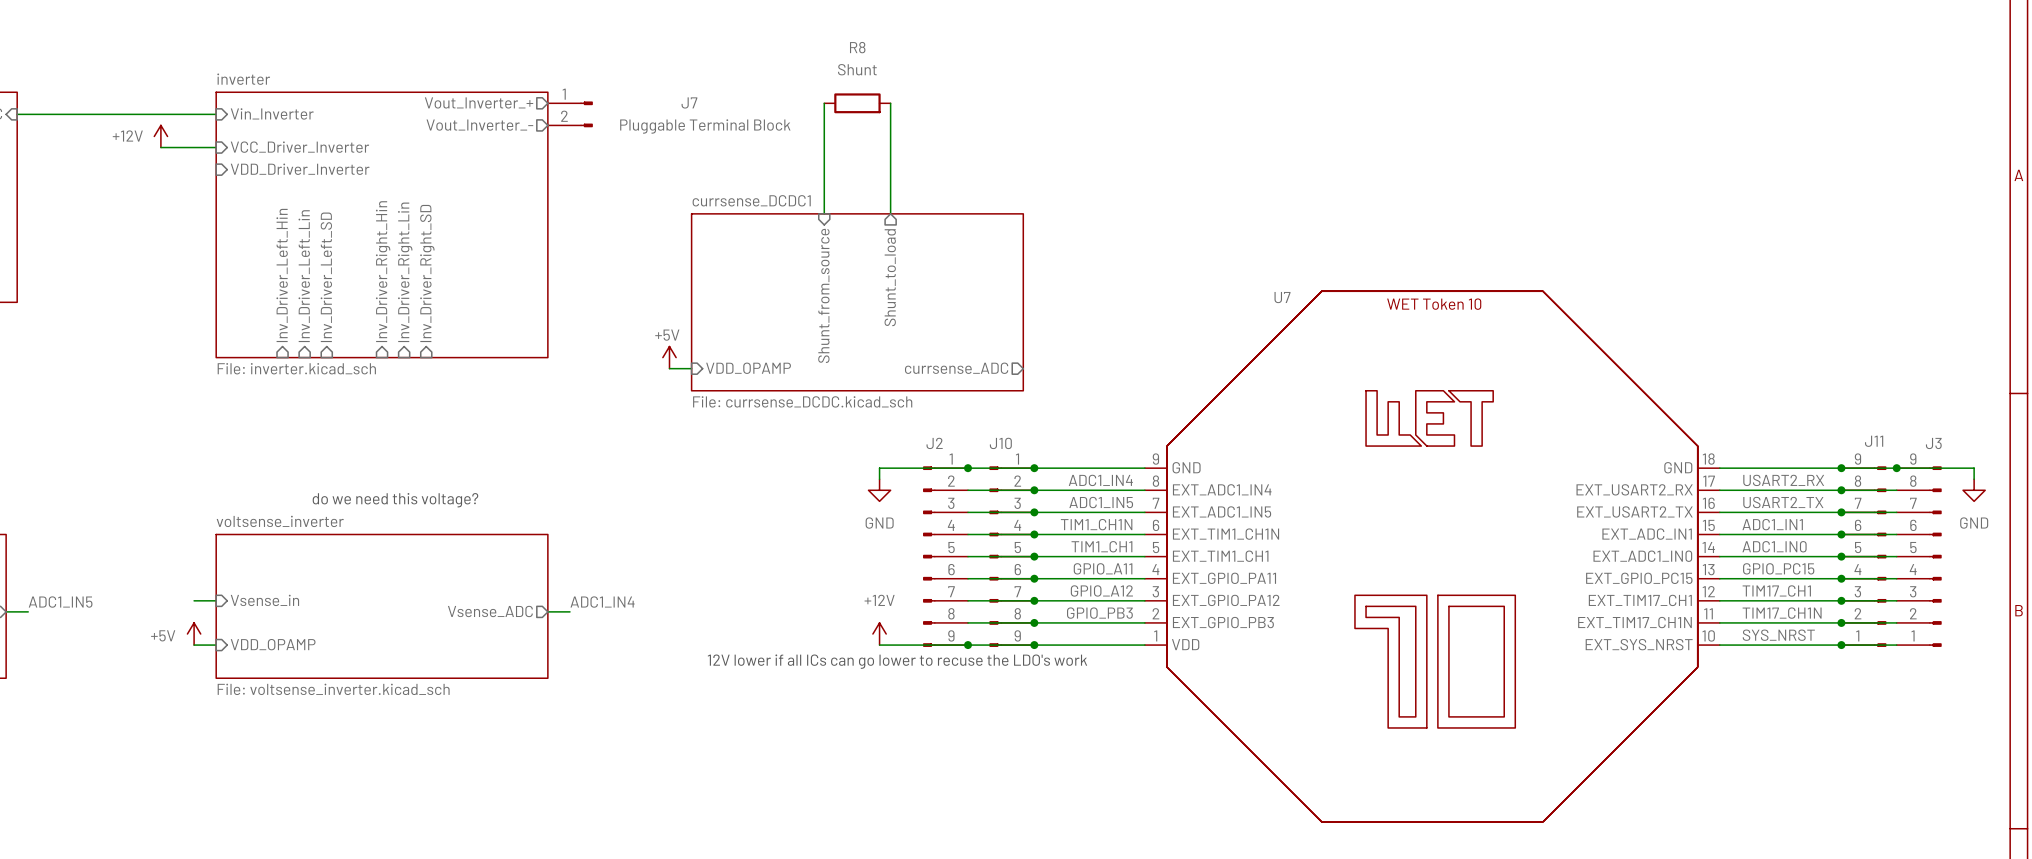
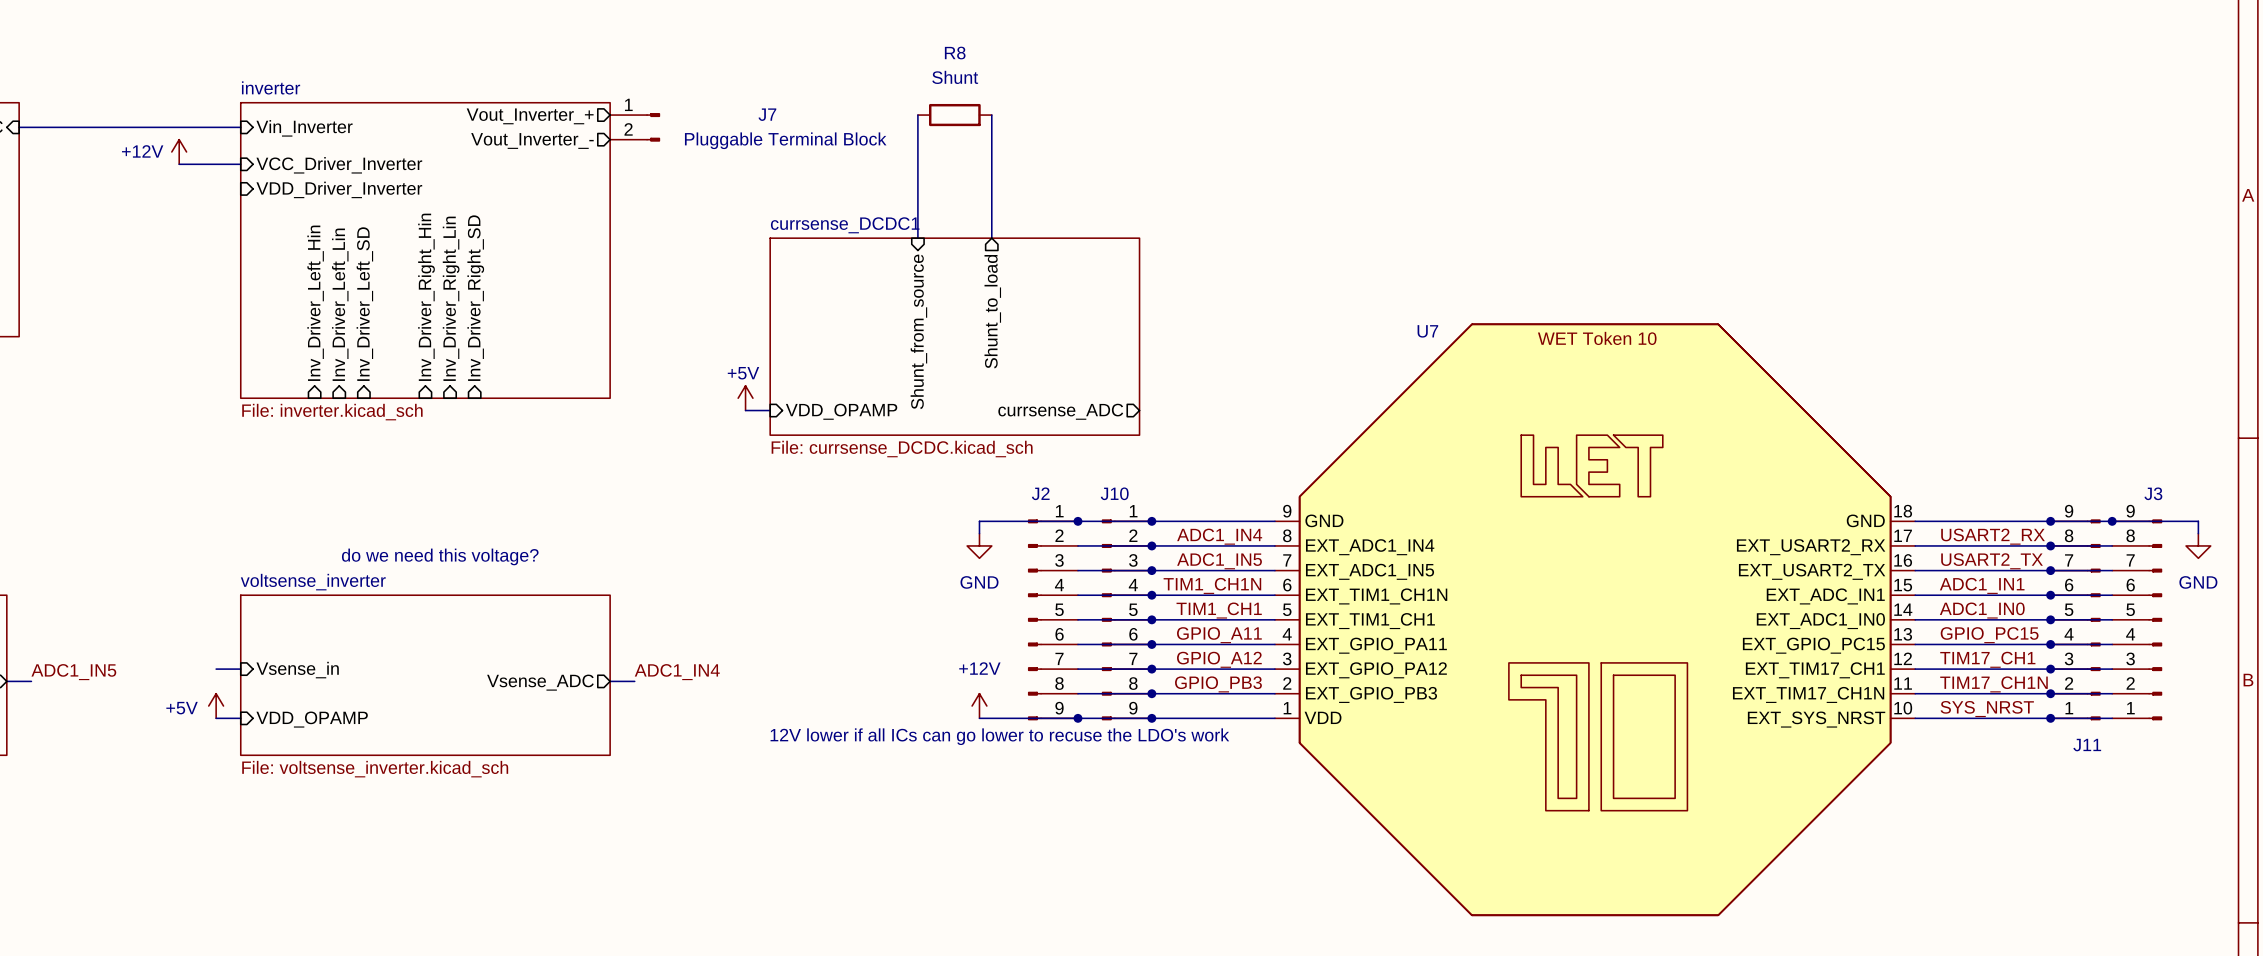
J11 name position: J11 (1874, 441) -> J11 (2087, 745)

